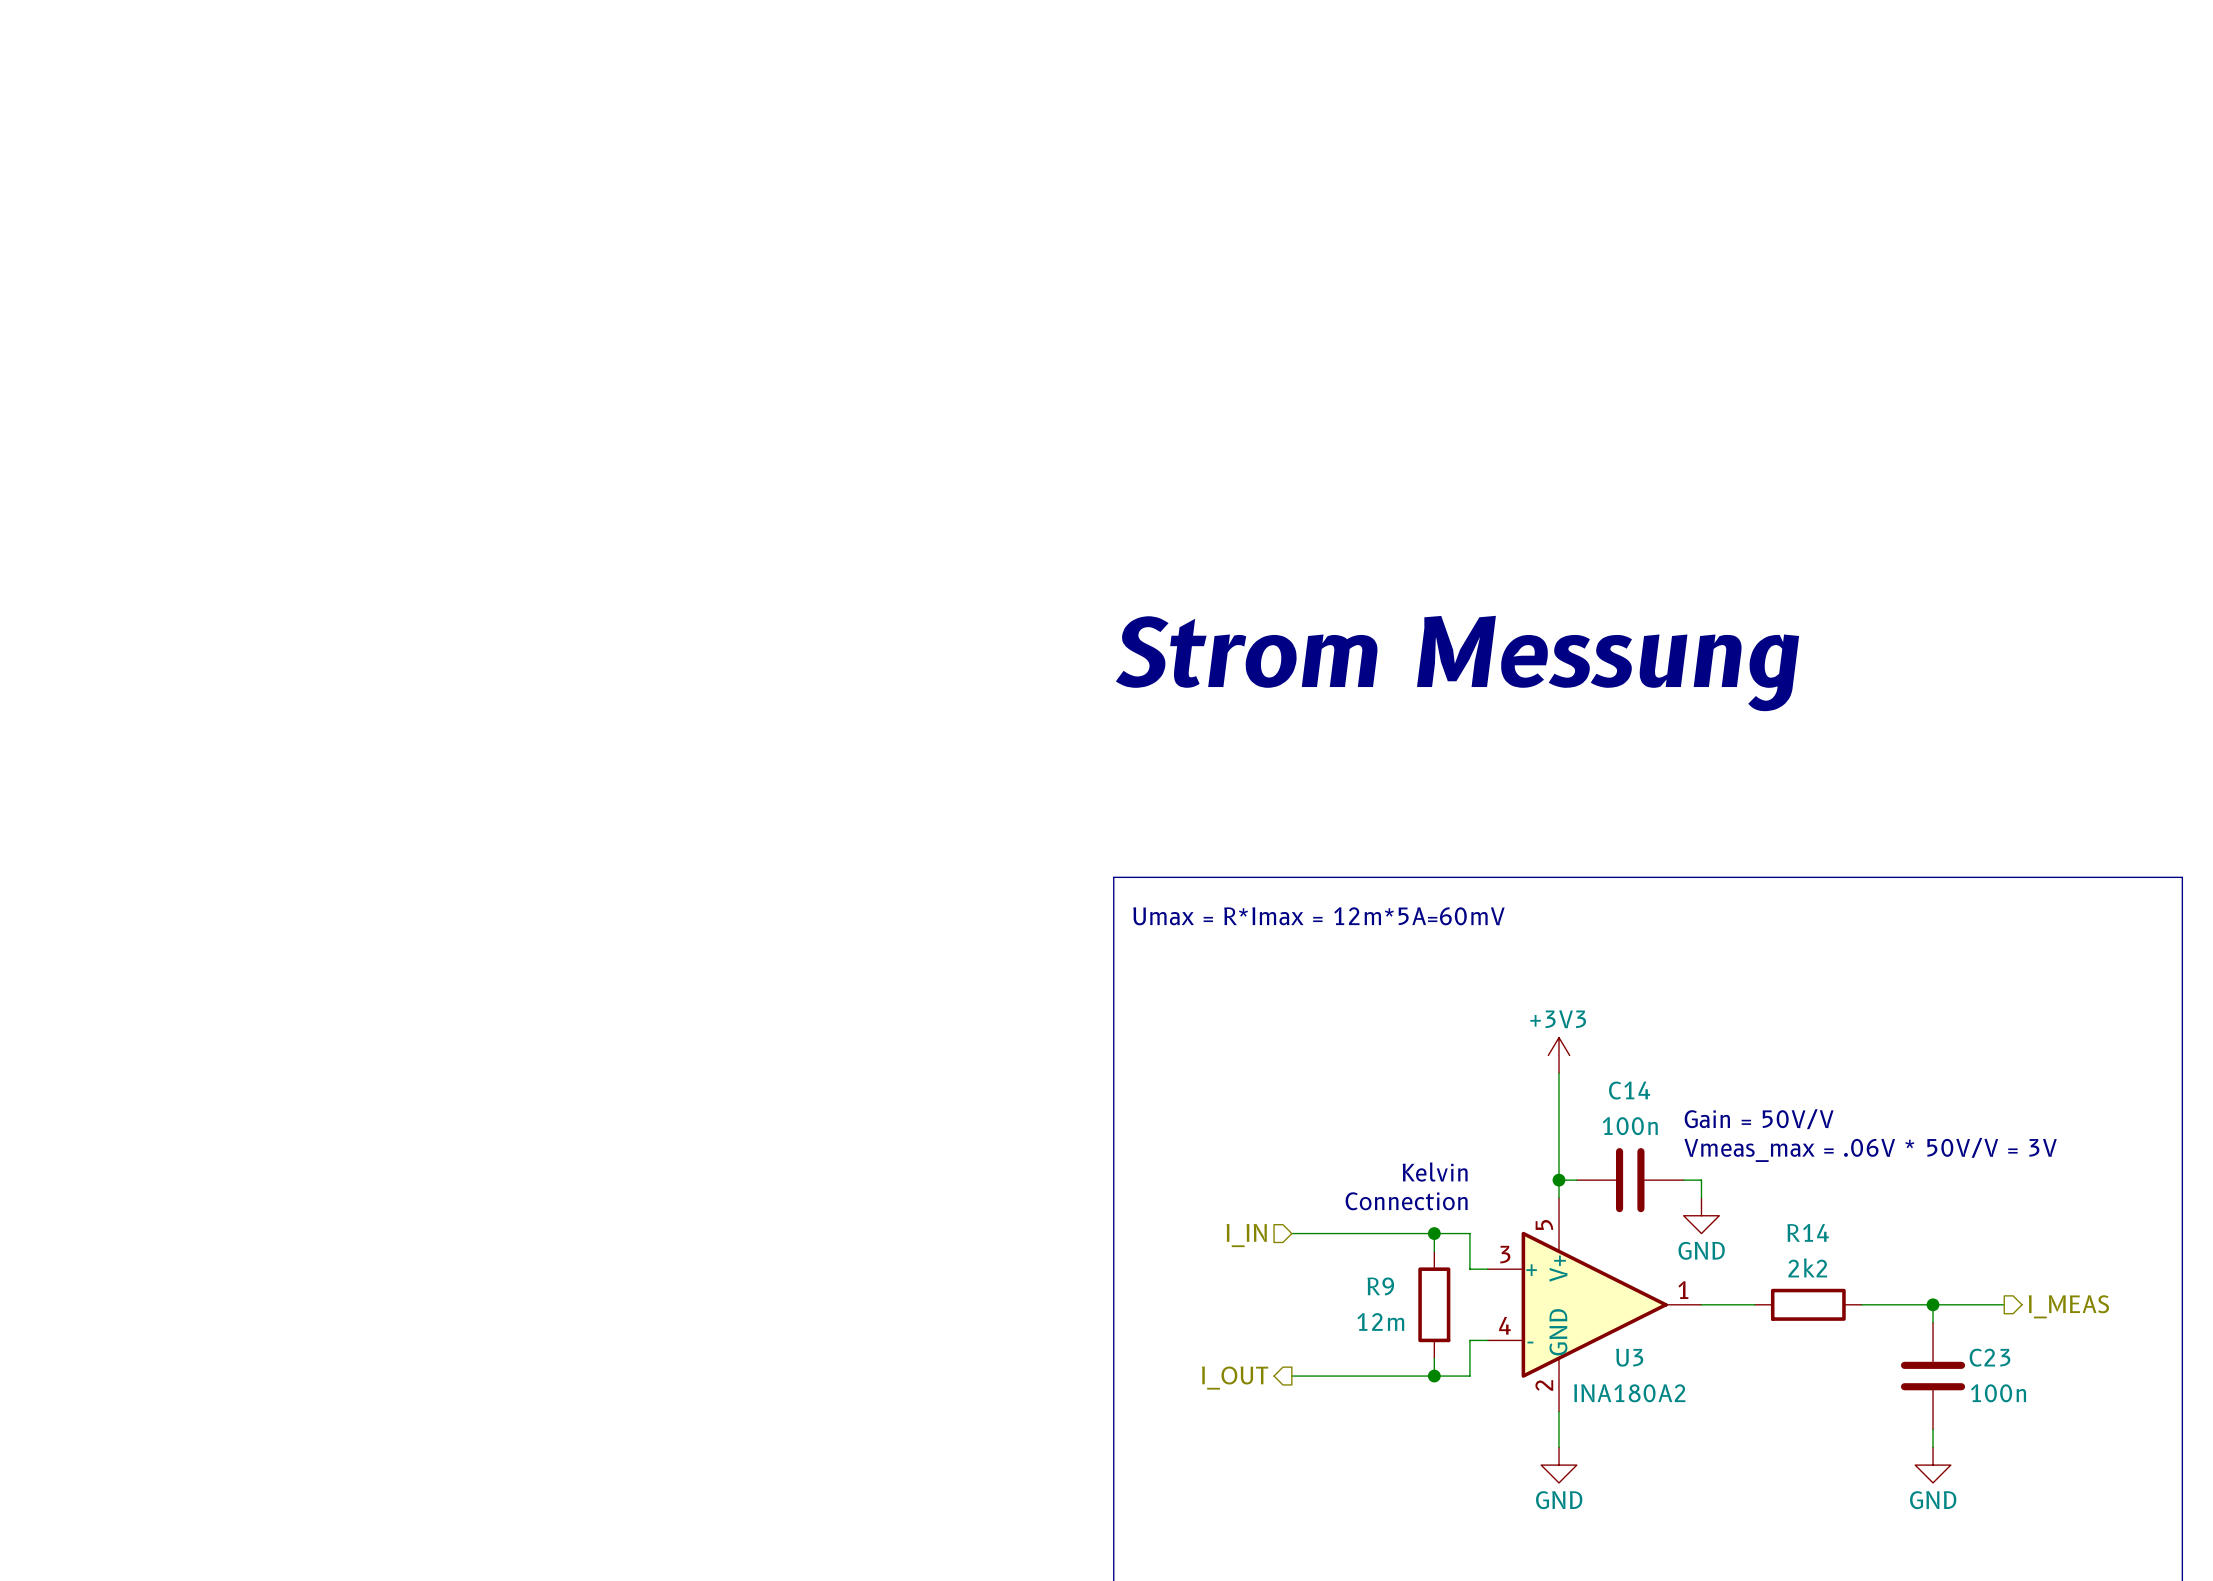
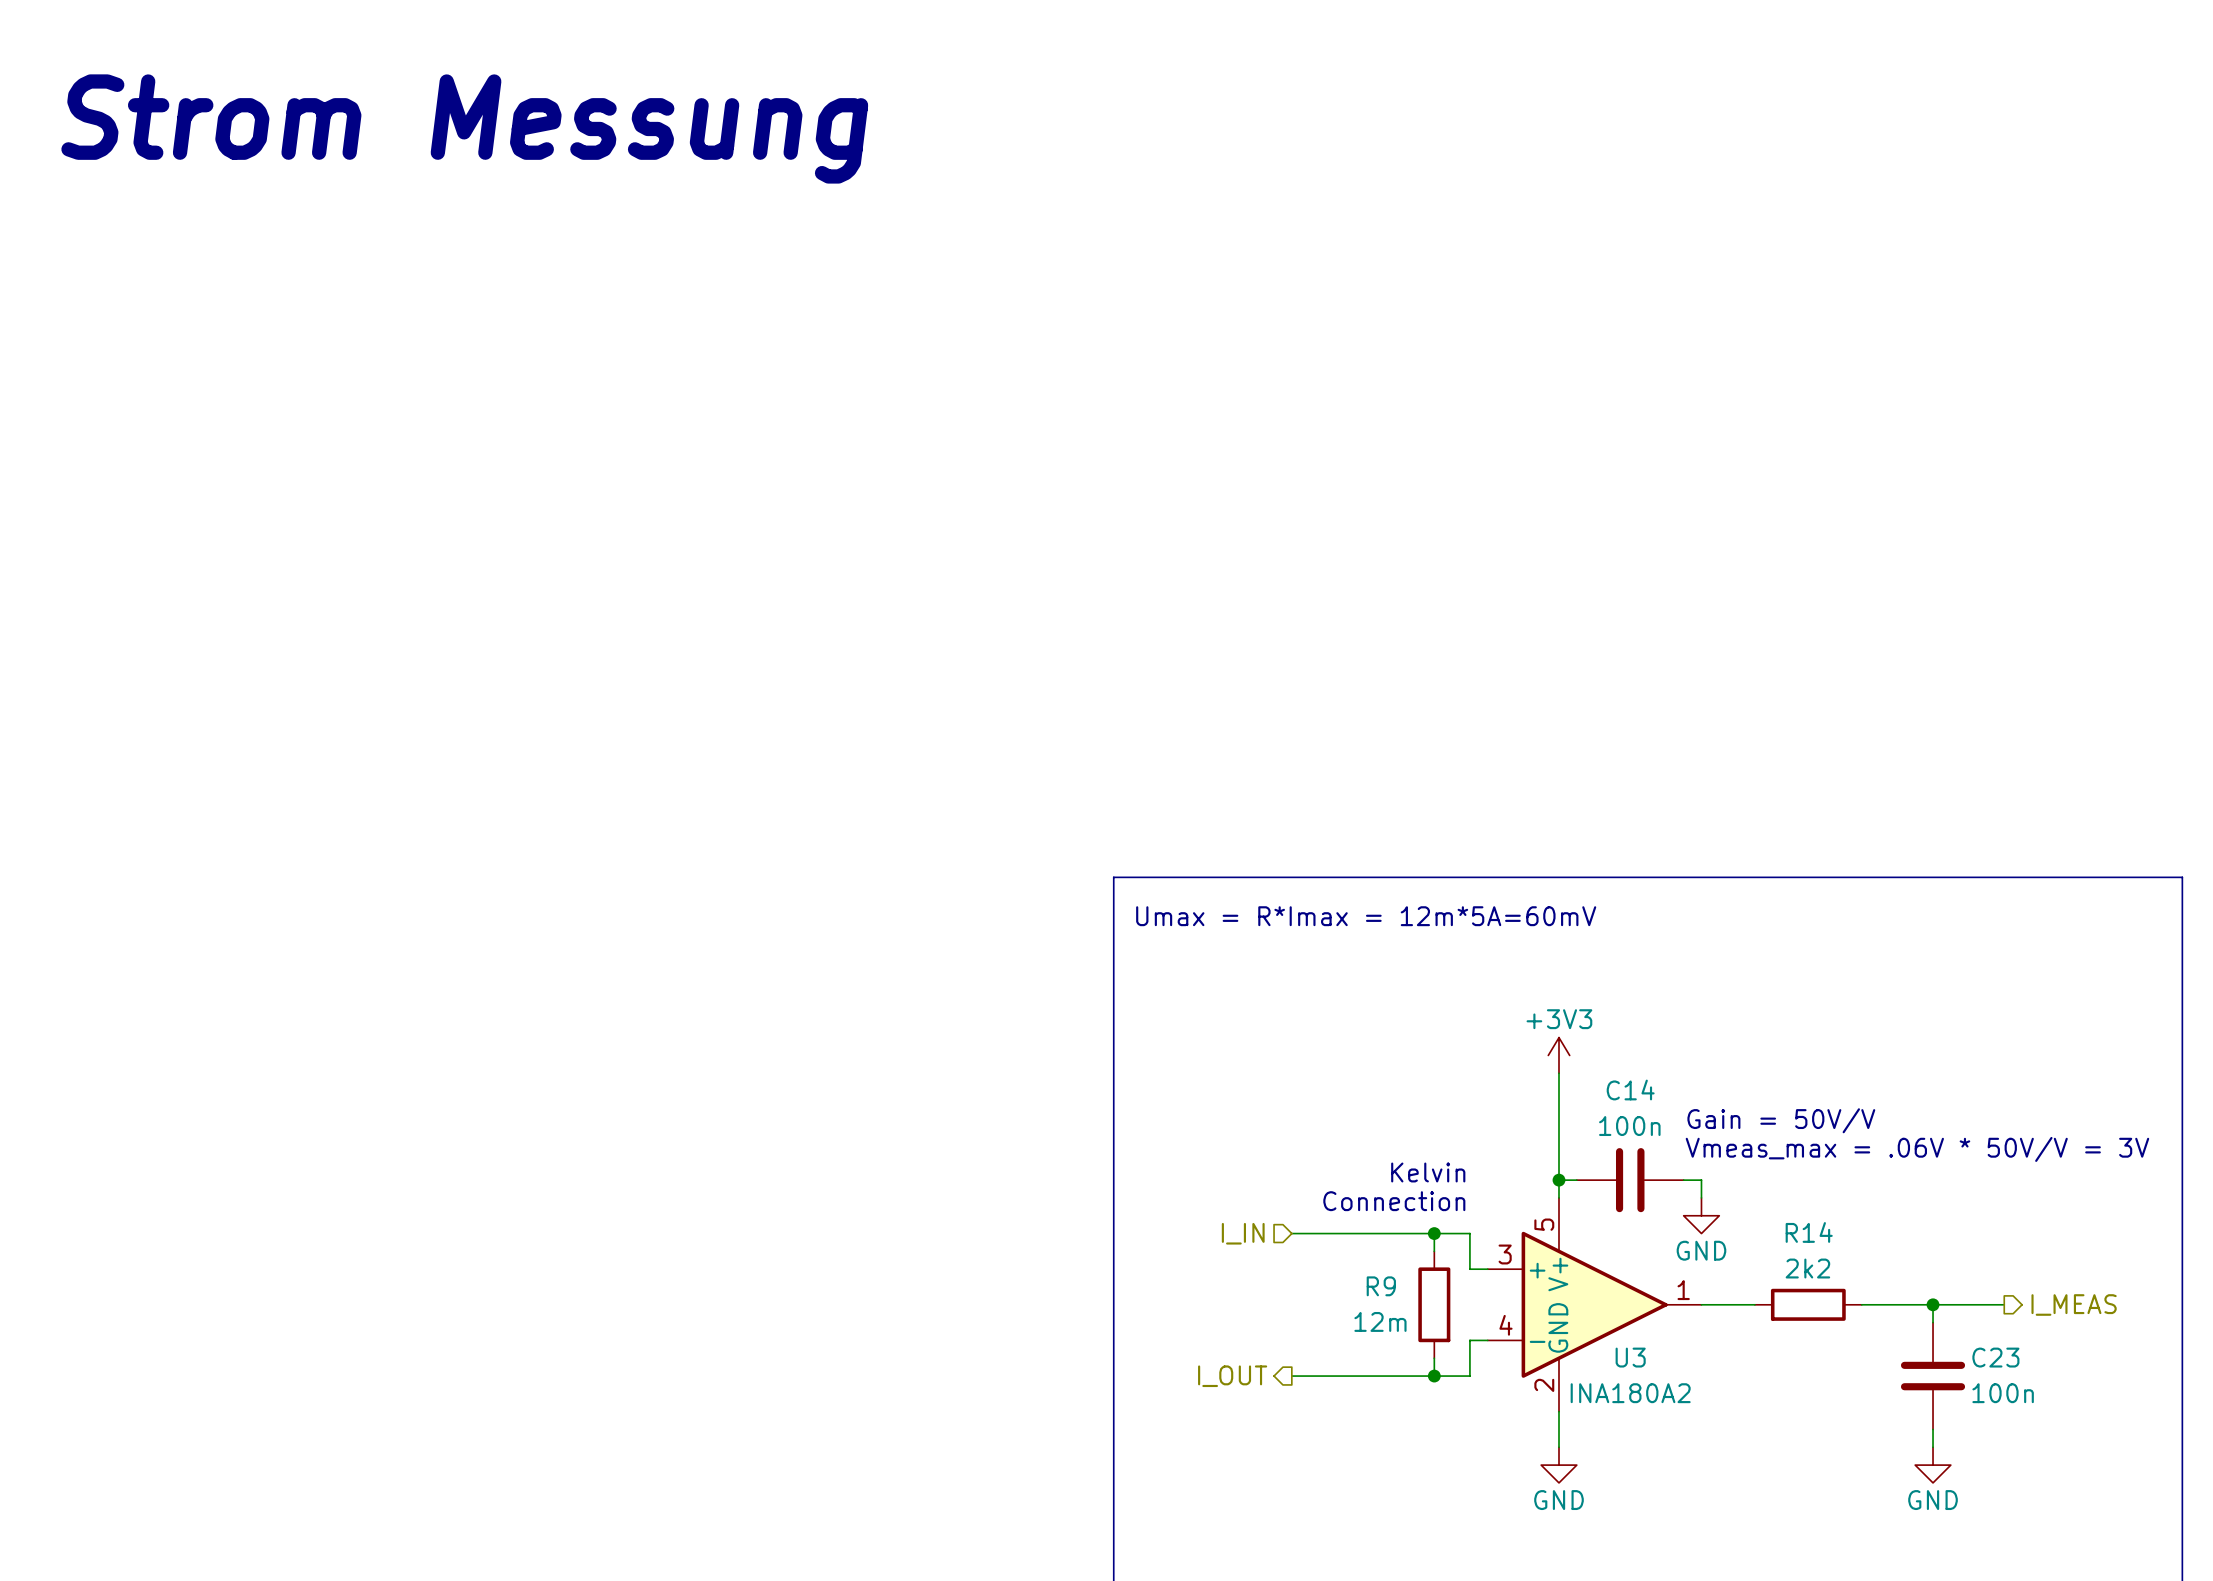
text: none -> Strom Messung (464, 128)
text: Strom Messung (1457, 663) -> none

